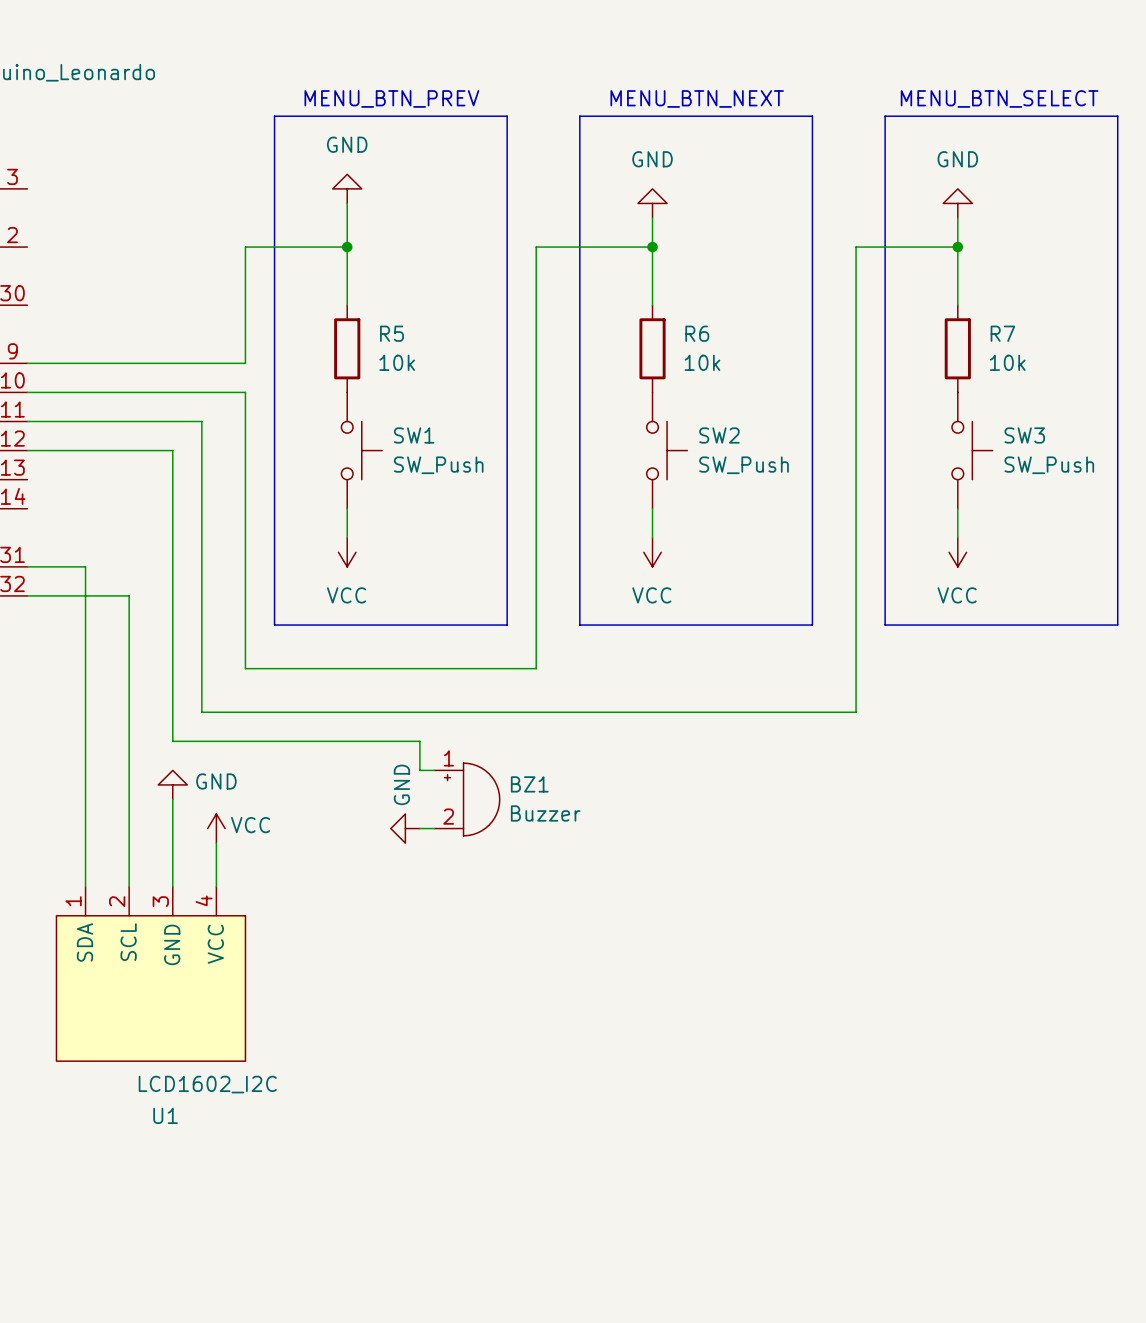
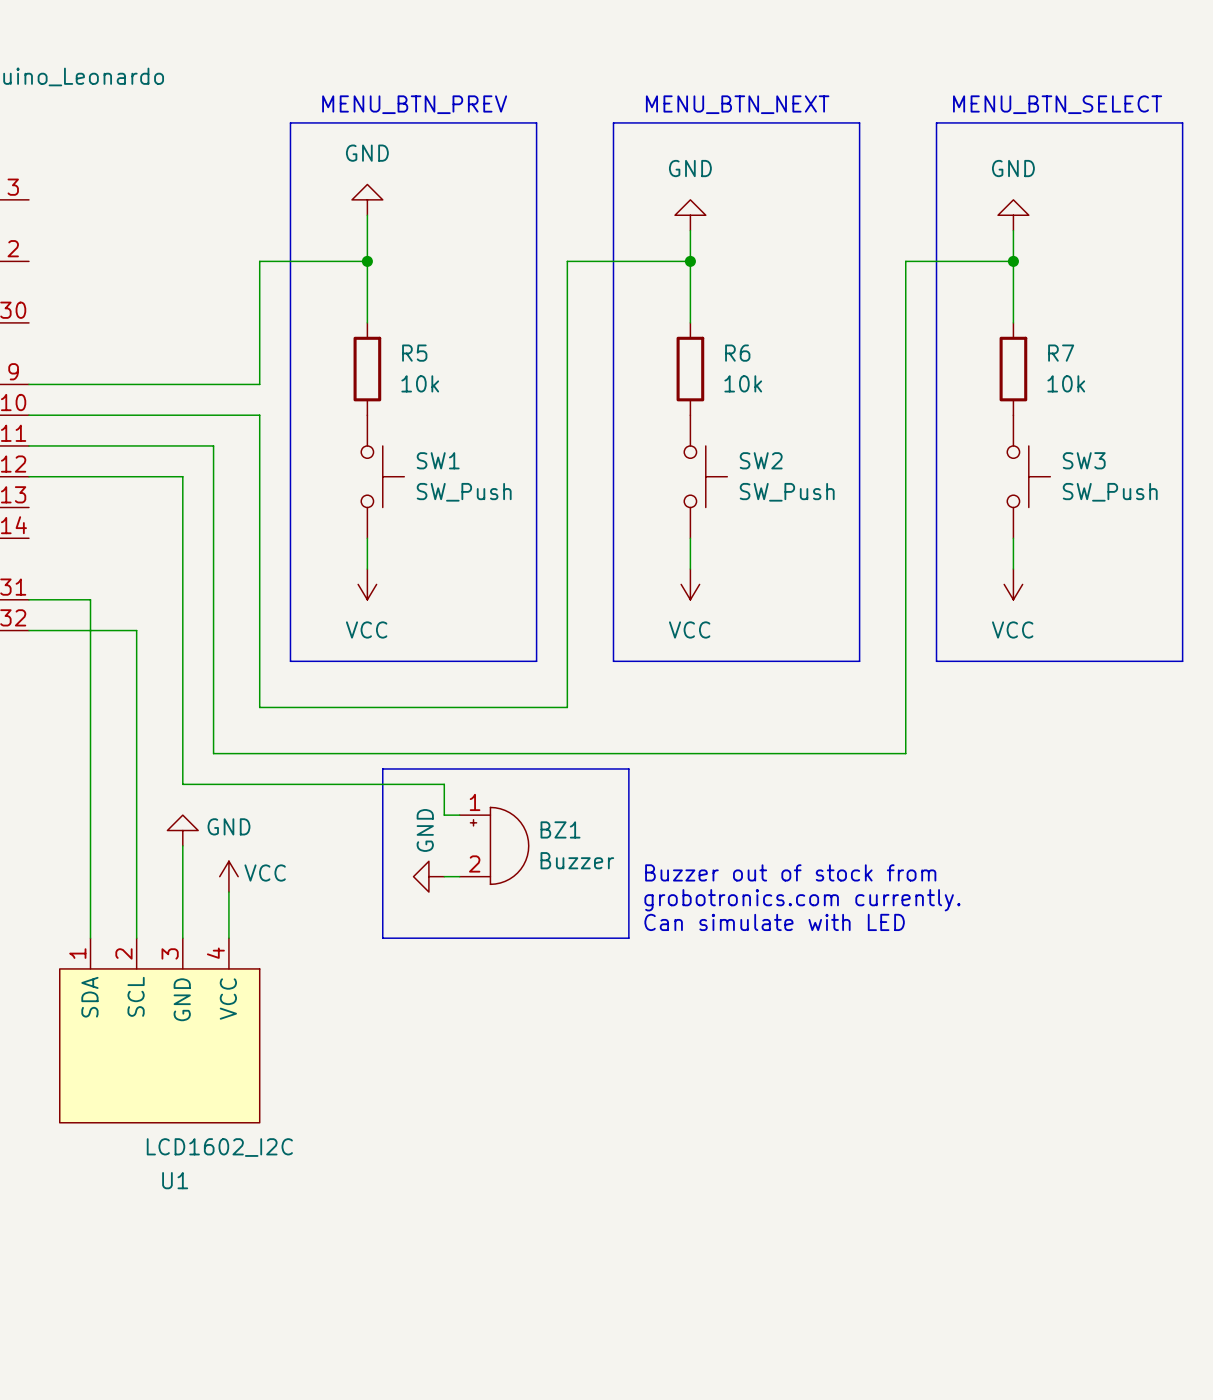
line: none -> (382, 768) (628, 768) (628, 938) (382, 938) (382, 768)
text: none -> Buzzer out of stock from (790, 872)
text: none -> grobotronics.com currently. (802, 900)
text: none -> Can simulate with LED (774, 922)

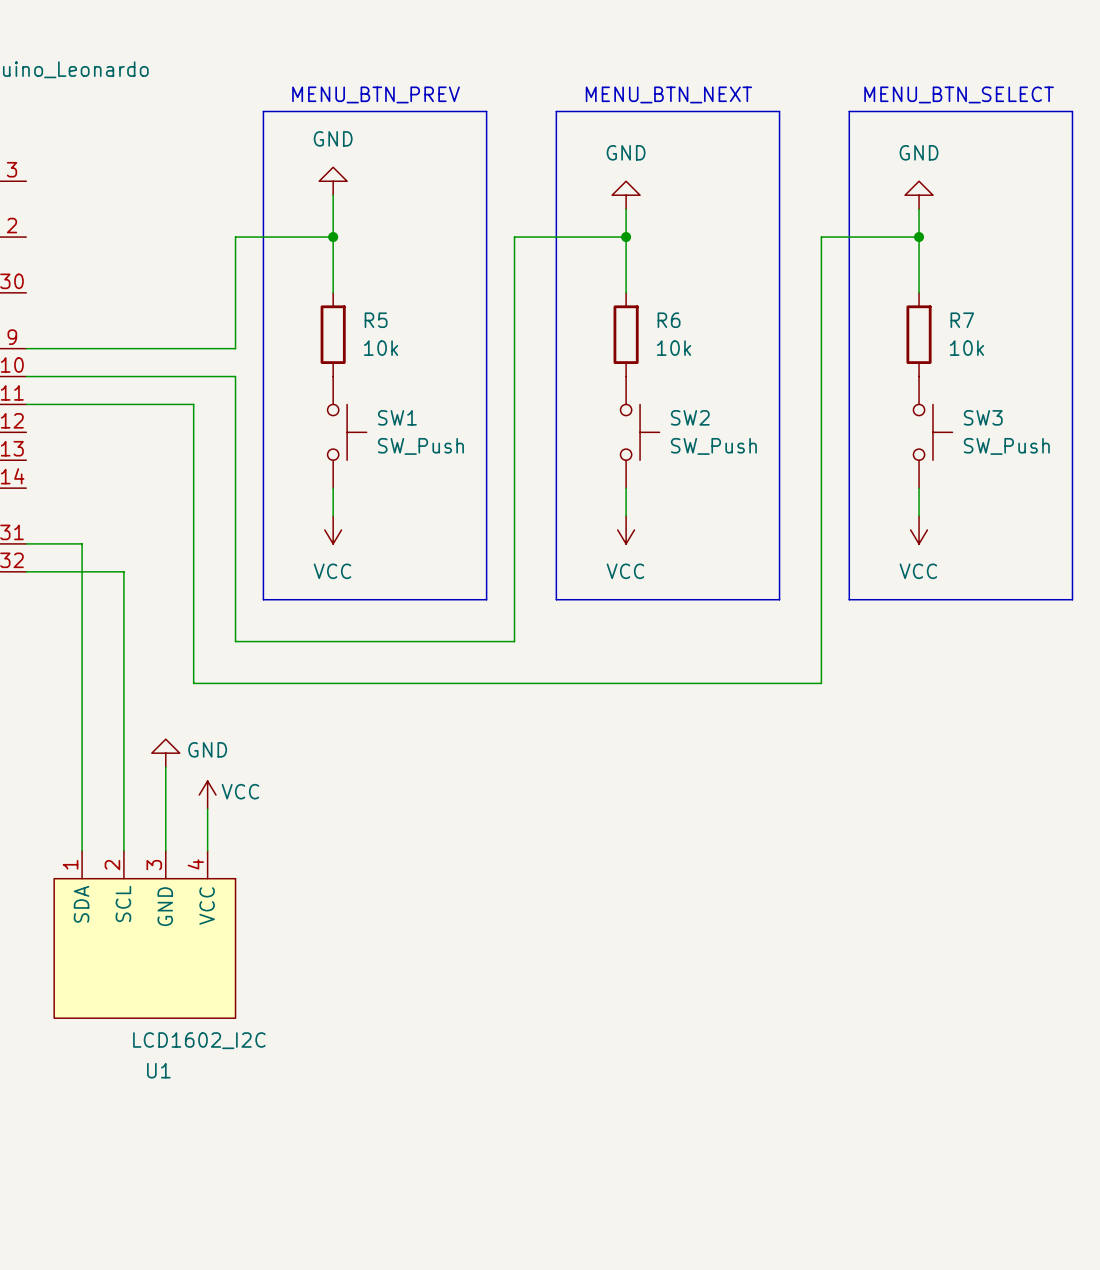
wire: (28, 476) (182, 476) (182, 784) (444, 784) (444, 815) (459, 815) -> none
line: (382, 768) (628, 768) (628, 938) (382, 938) (382, 768) -> none
BZ1: Buzzer (494, 845) -> none
text: Buzzer out of stock from (790, 872) -> none
power symbol: GND (428, 876) -> none
wire: (444, 876) (459, 876) -> none
text: grobotronics.com currently. (802, 900) -> none
text: Can simulate with LED (774, 922) -> none

